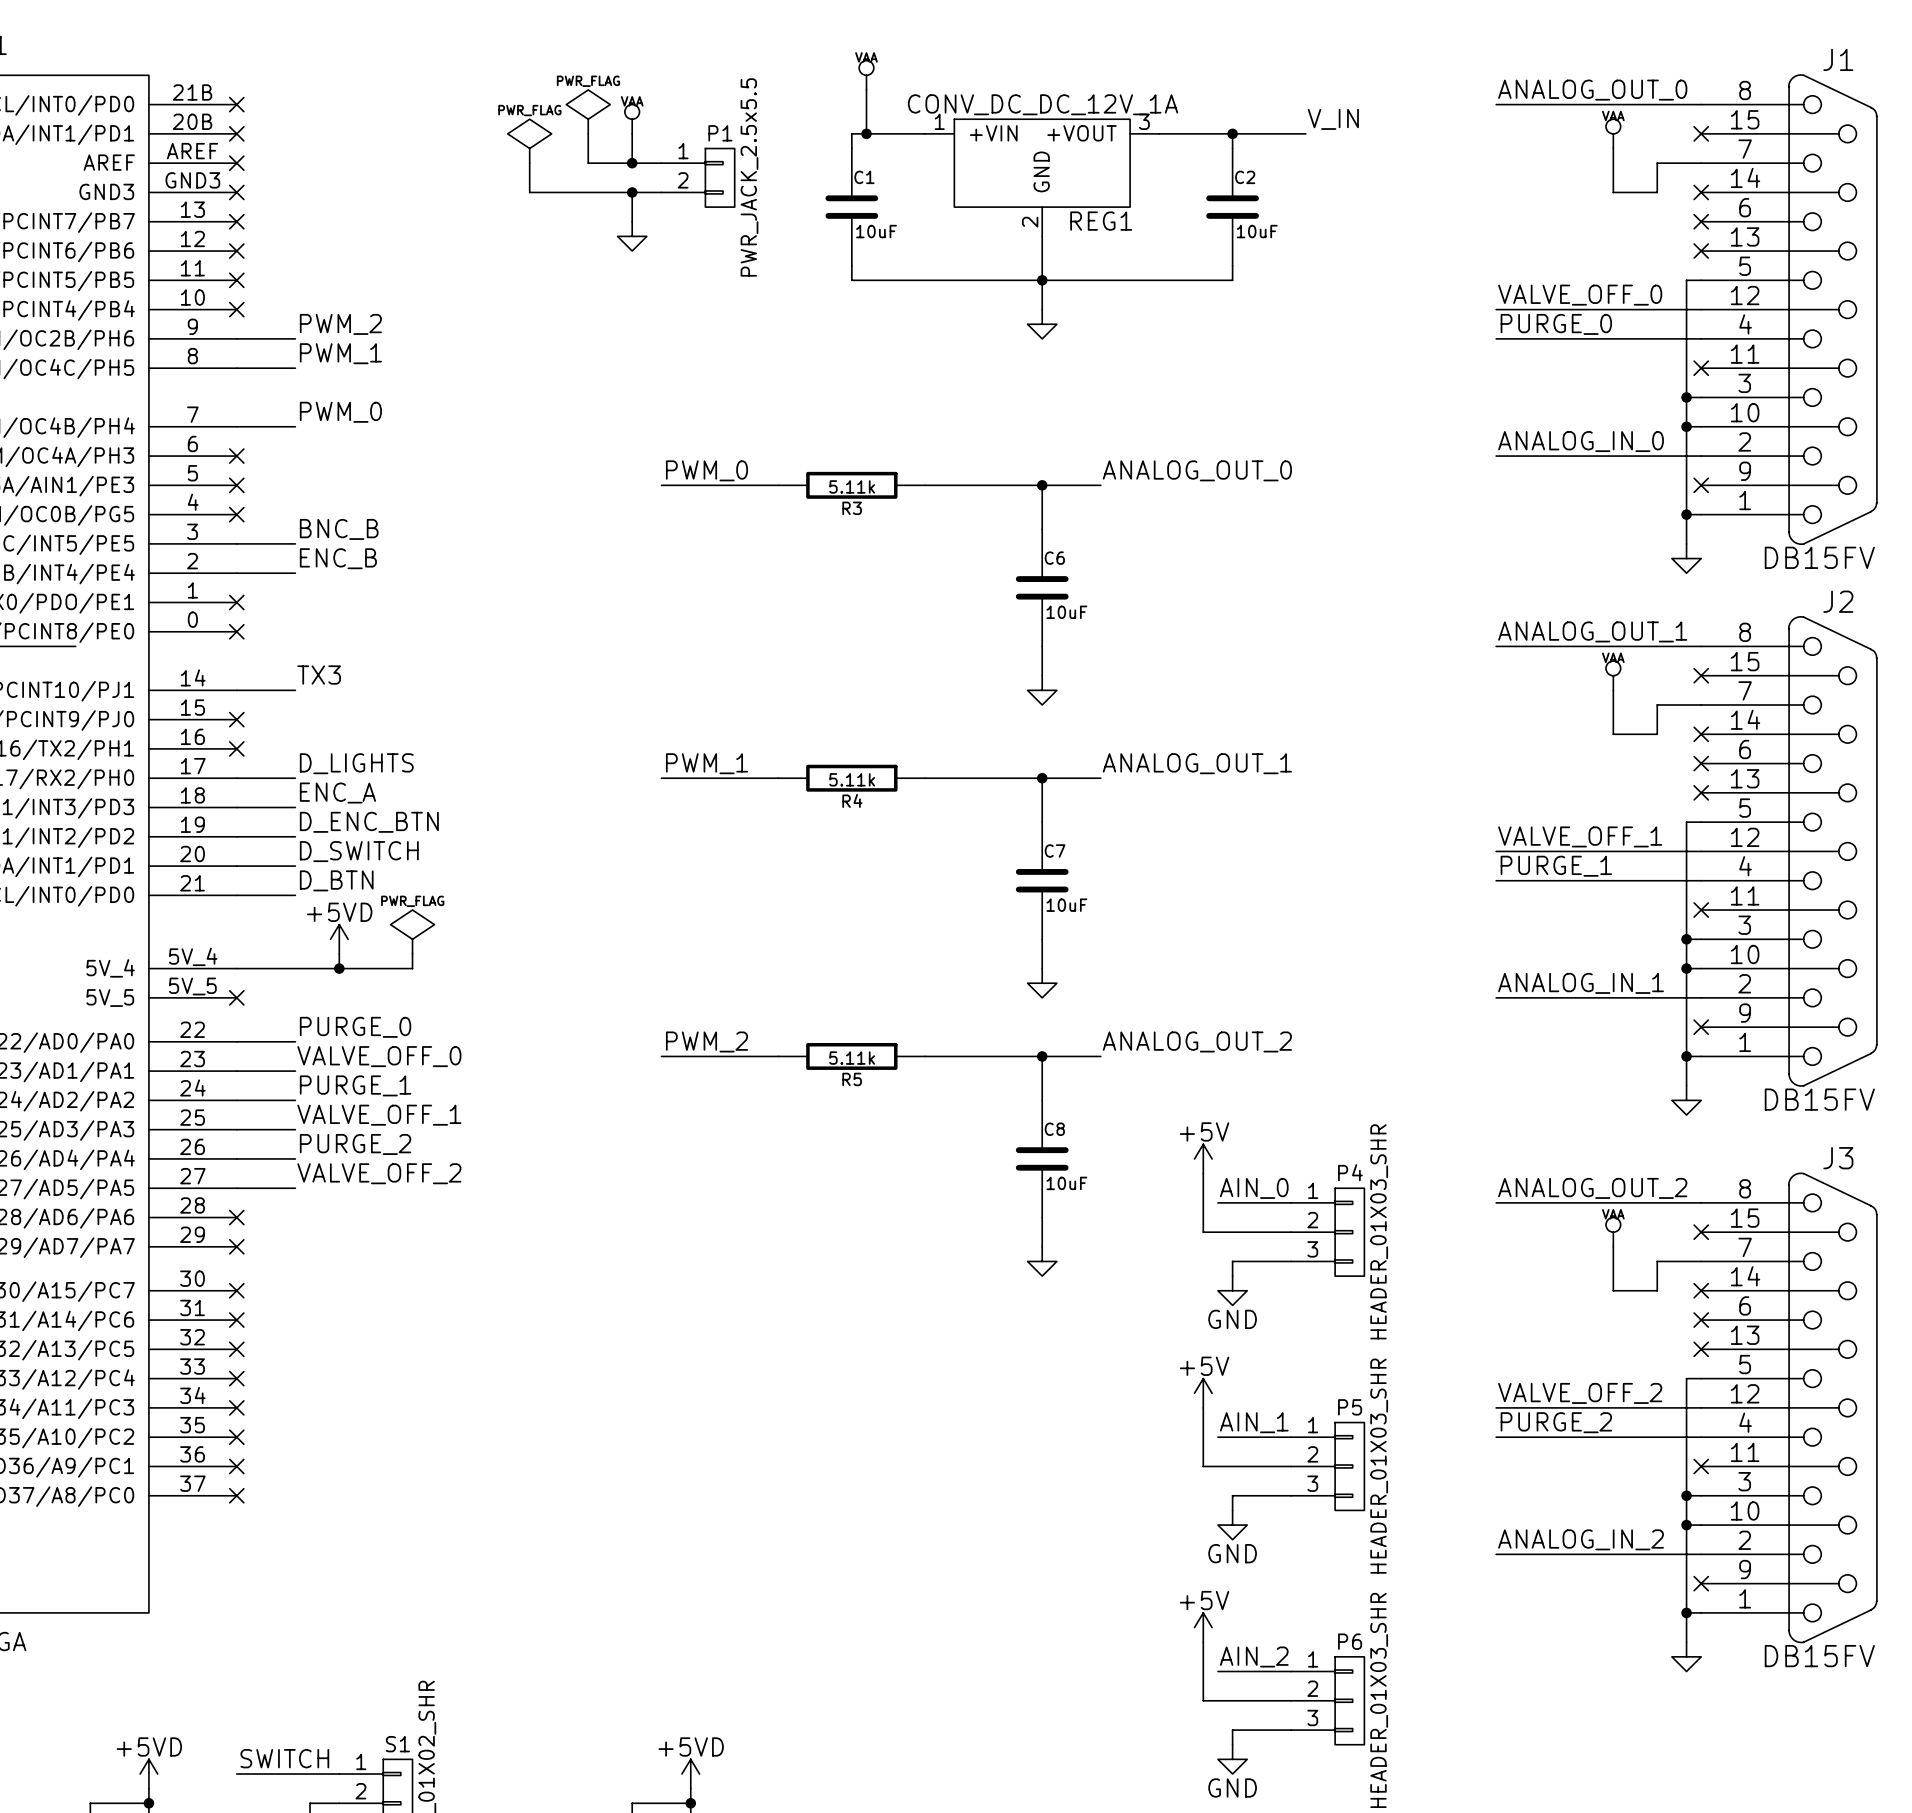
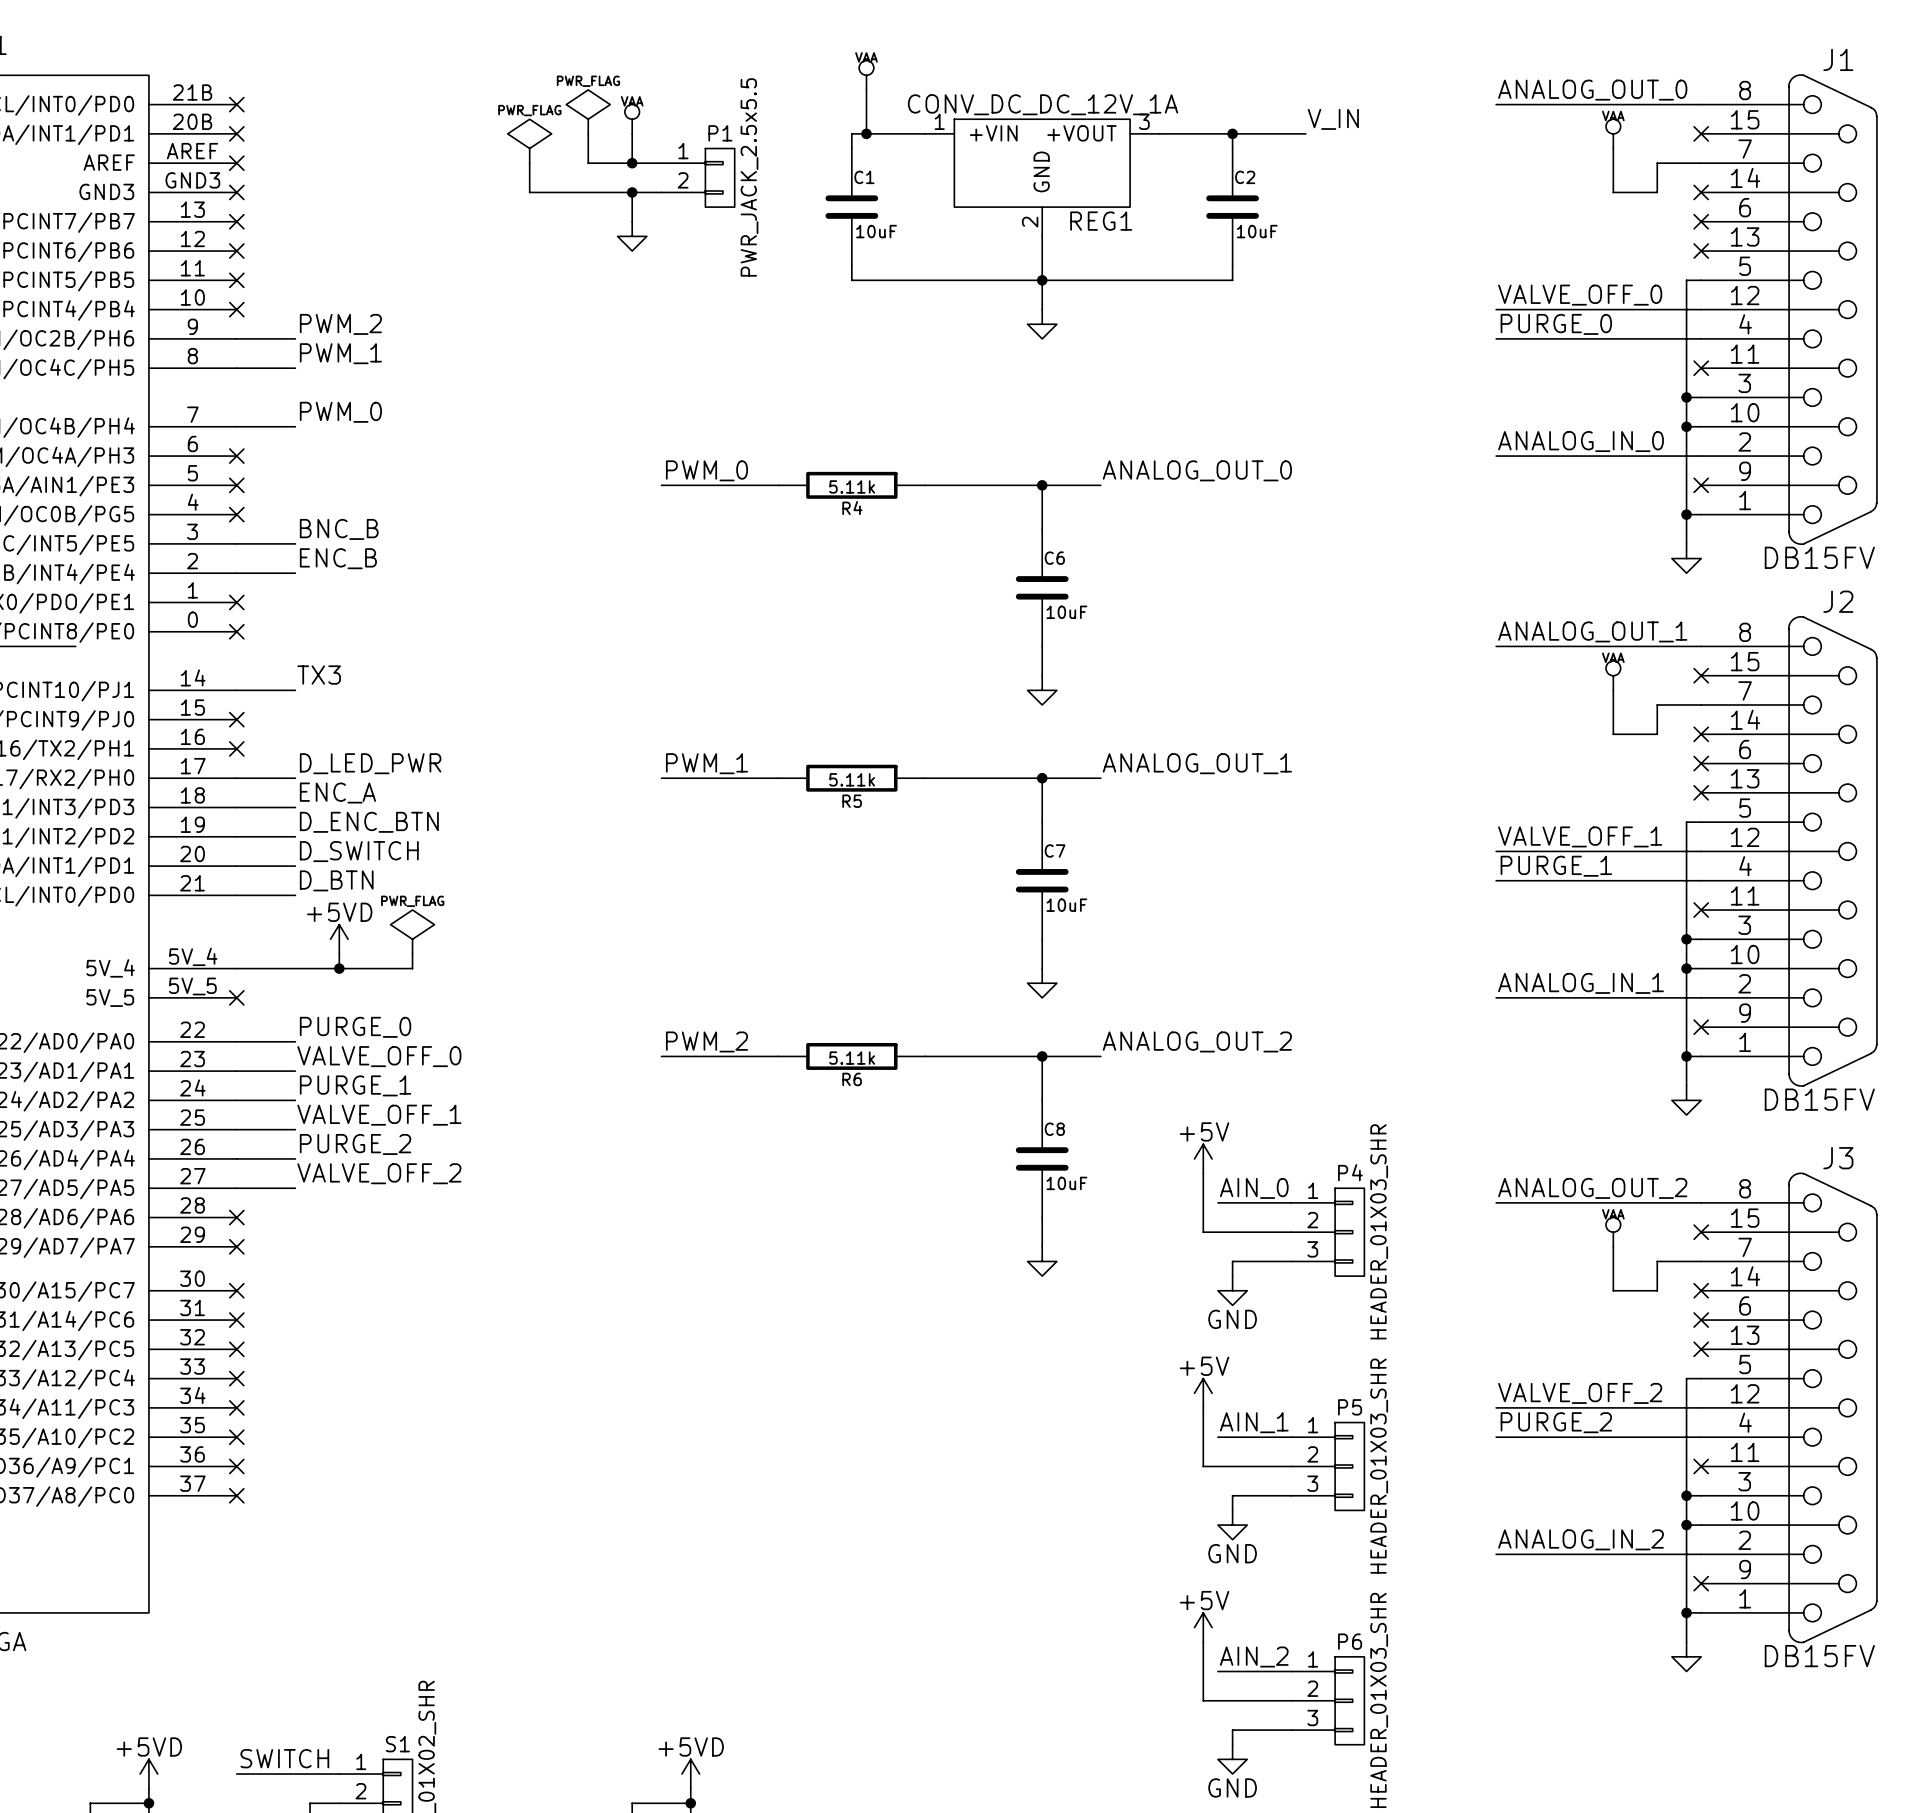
R3 name: R3 (852, 508) -> R4 (852, 508)
label: D_LIGHTS (356, 763) -> D_LED_PWR (370, 763)
R4 name: R4 (852, 800) -> R5 (852, 801)
R5 name: R5 (852, 1079) -> R6 (852, 1079)

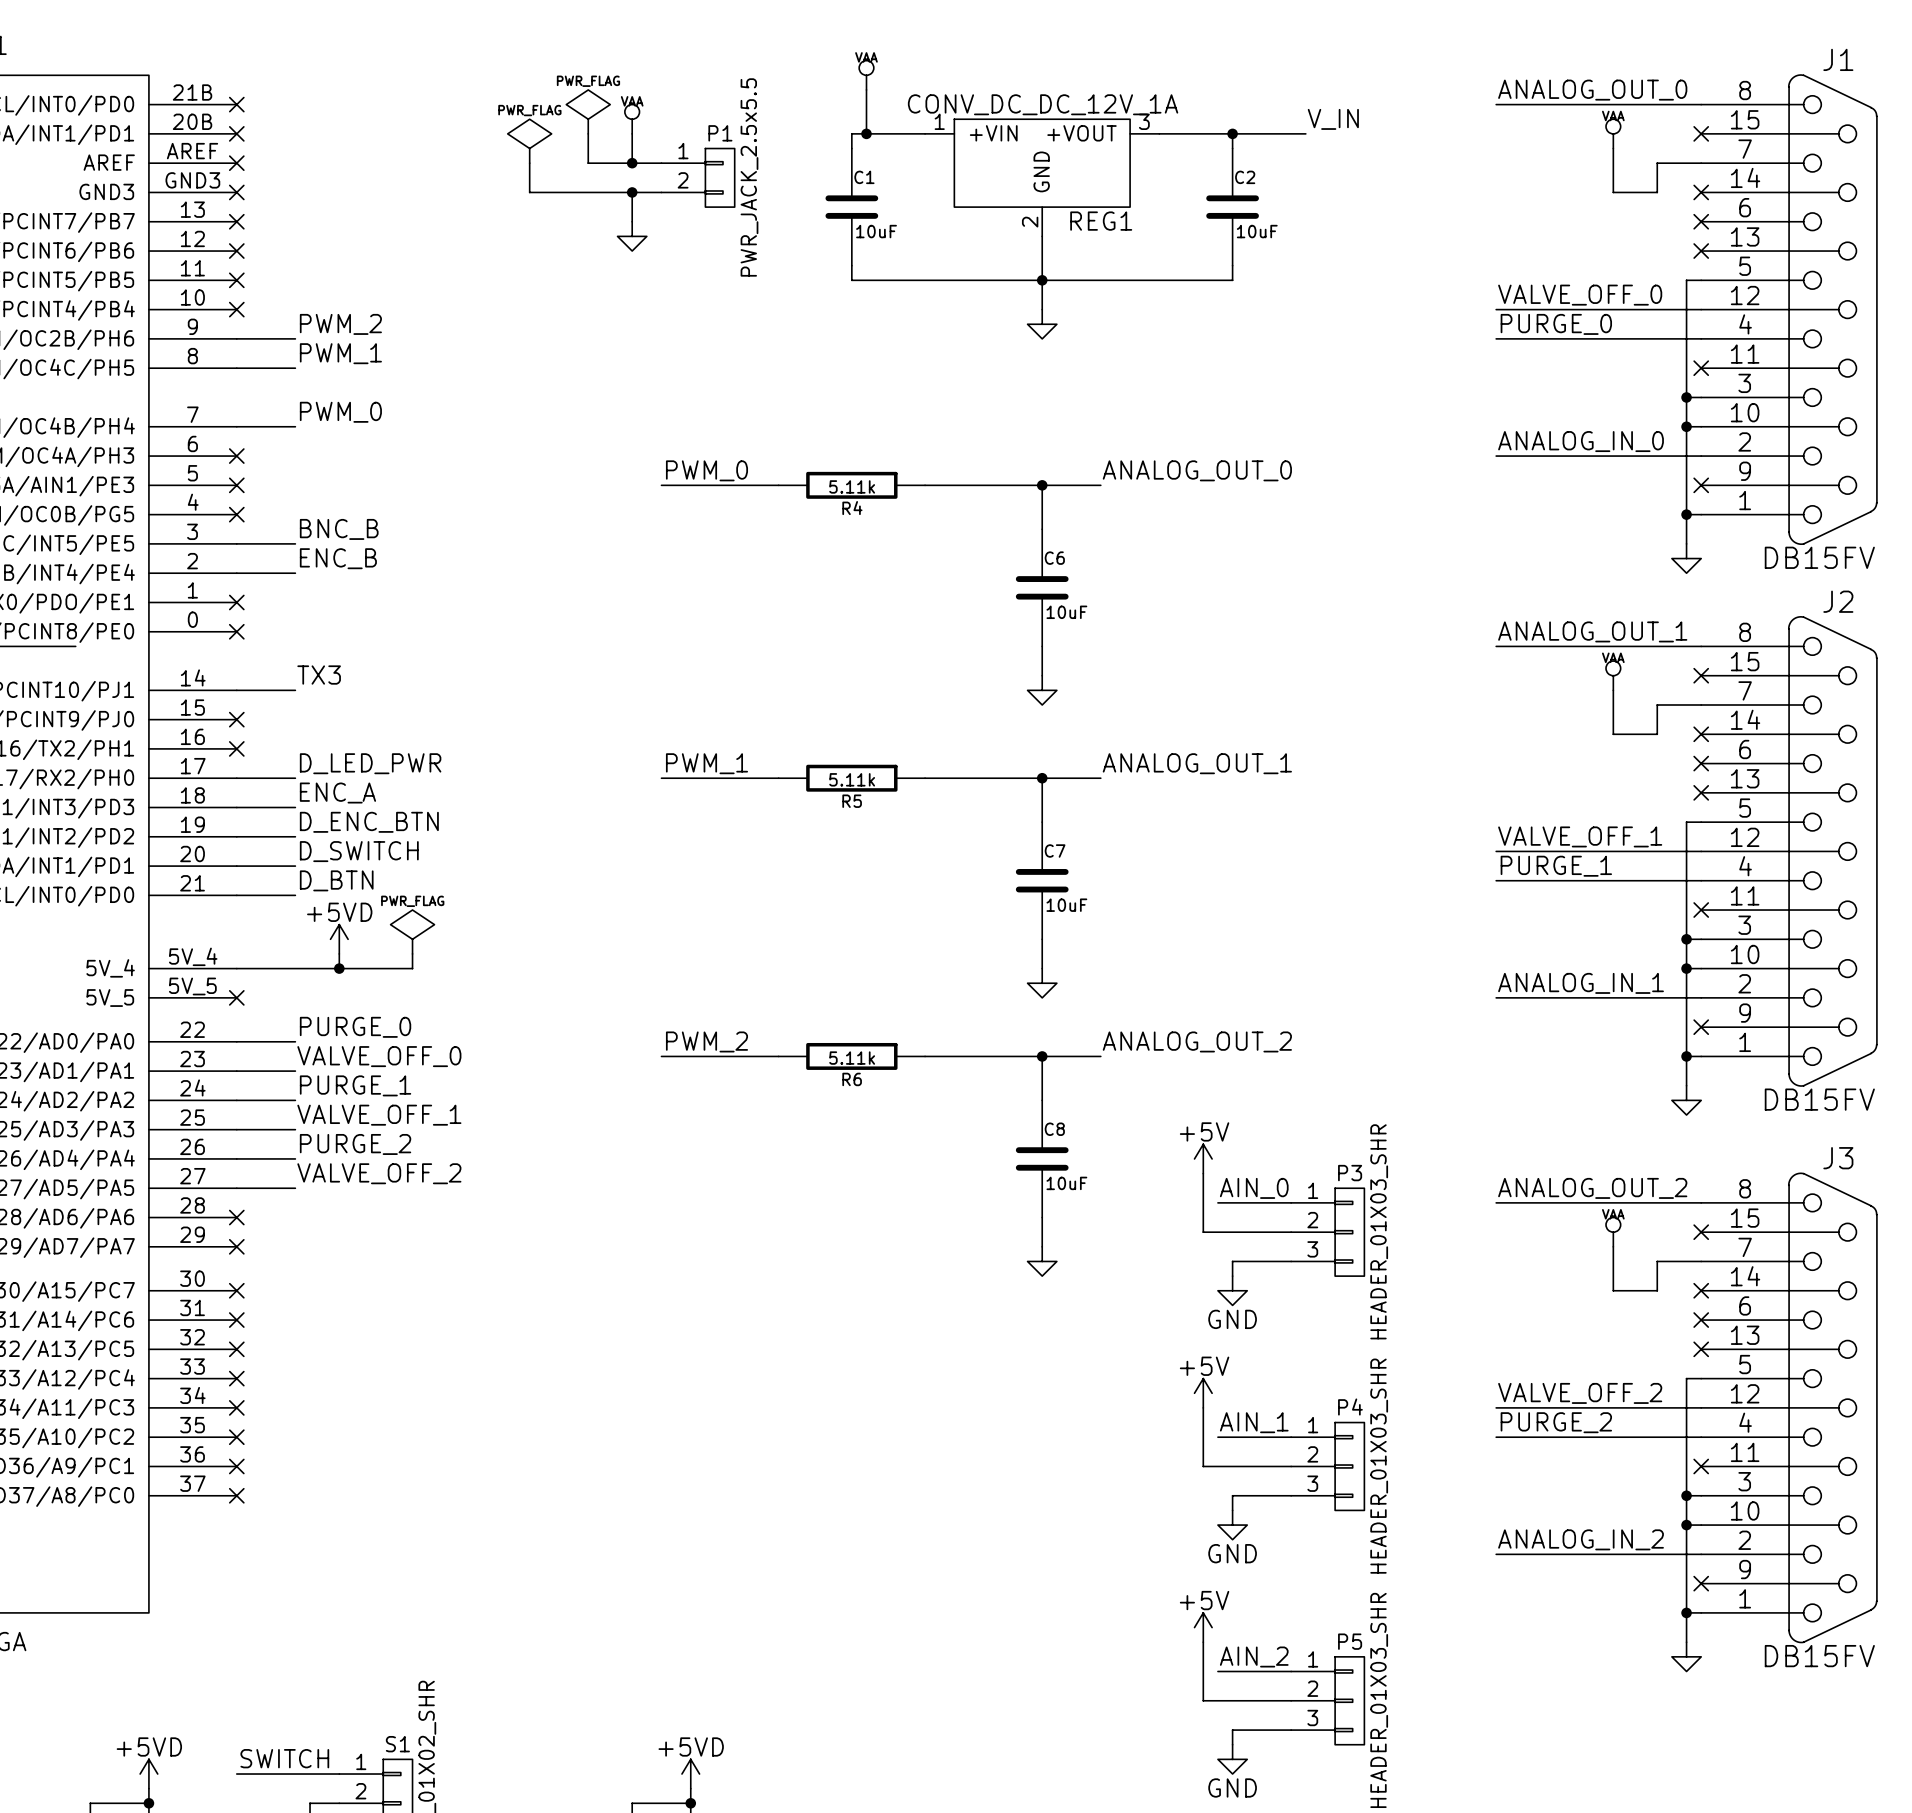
P4 name: P4 (1350, 1172) -> P3 (1350, 1173)
P5 name: P5 (1350, 1407) -> P4 (1350, 1407)
P6 name: P6 (1350, 1641) -> P5 (1350, 1641)

